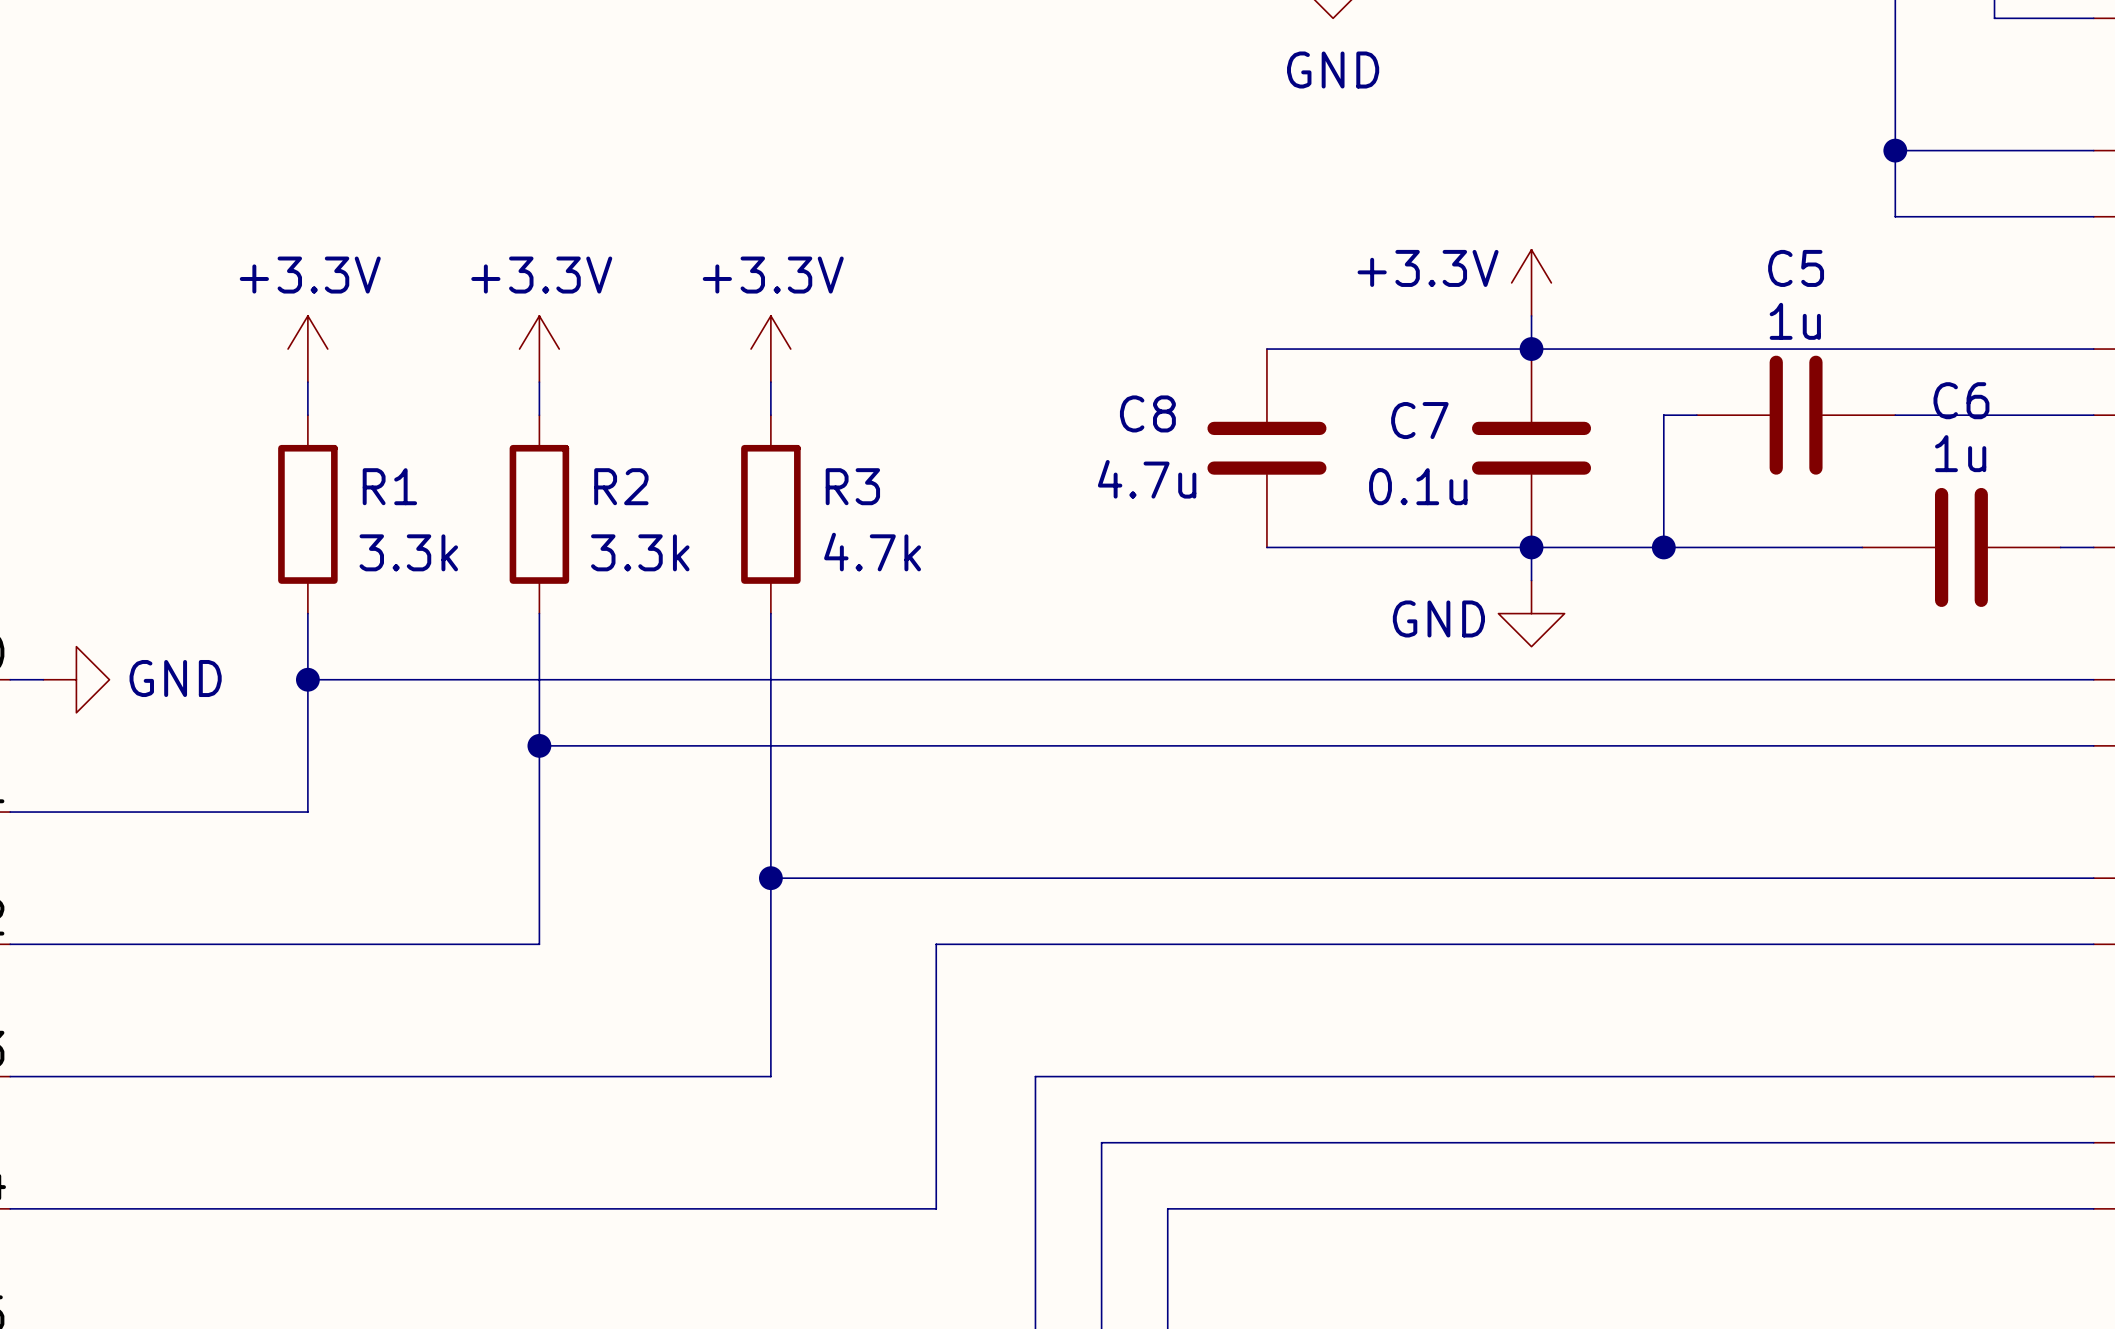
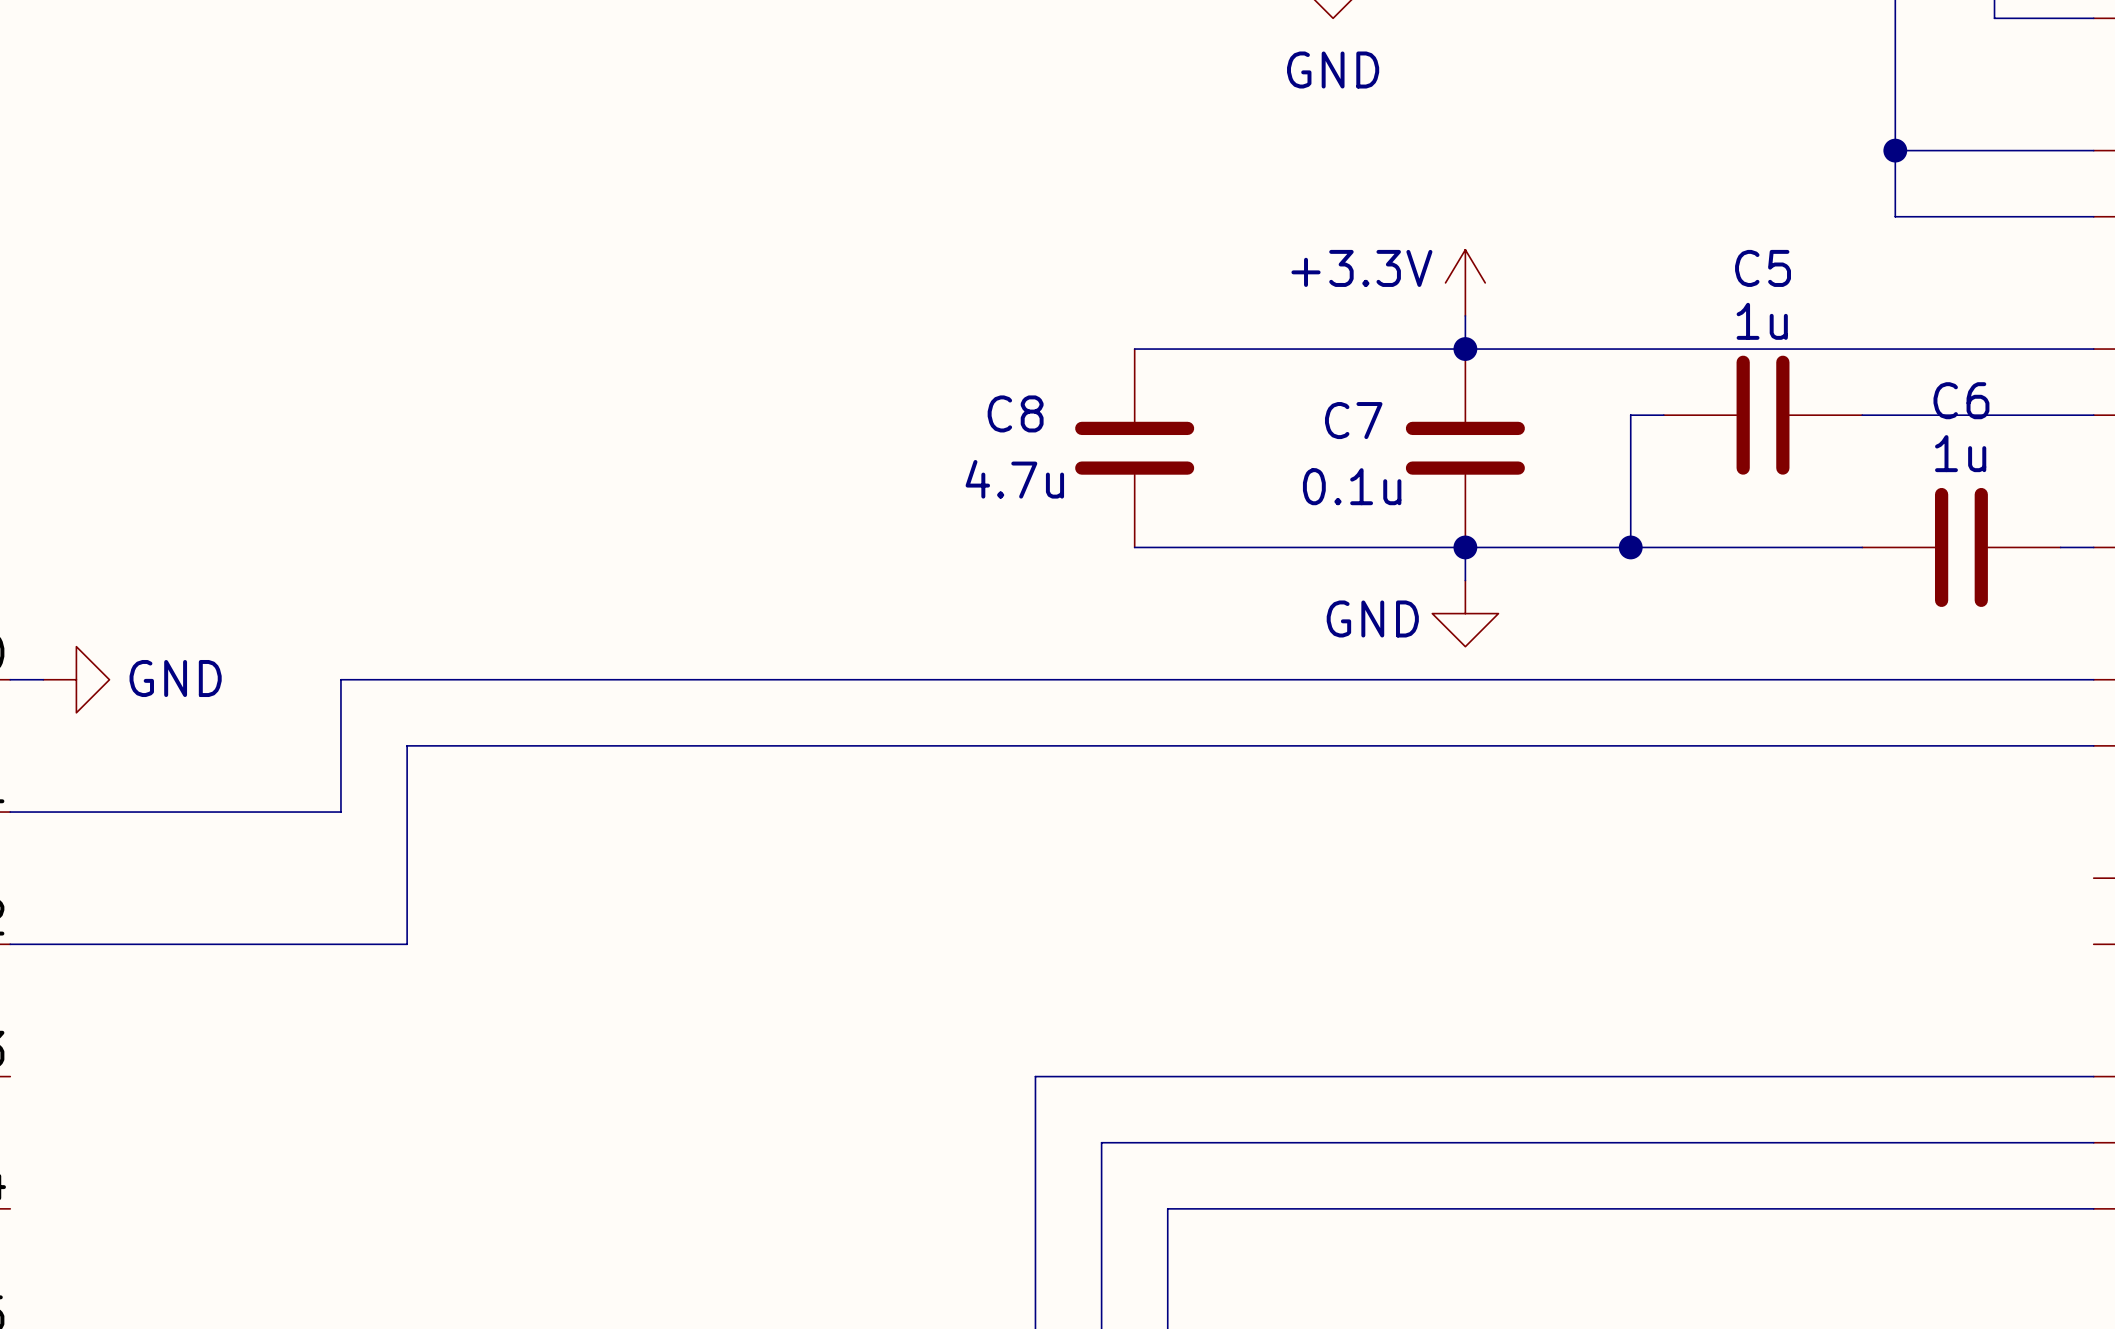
power symbol position: +3.3V (1531, 282) -> +3.3V (1465, 282)
wire: (1531, 315) (1531, 349) -> (1465, 315) (1465, 349)
power symbol: +3.3V (307, 349) -> none
power symbol: +3.3V (539, 349) -> none
power symbol: +3.3V (770, 349) -> none
wire: none -> (1134, 349) (1266, 349)
junction position: (1531, 349) -> (1465, 349)
wire: (307, 382) (307, 415) -> none
wire: (539, 382) (539, 415) -> none
wire: (770, 382) (770, 415) -> none
wire: (1696, 415) (1663, 415) (1663, 547) -> (1663, 415) (1630, 415) (1630, 547)
C5 position: (1796, 415) -> (1763, 415)
C8 position: (1266, 448) -> (1134, 448)
C7 position: (1531, 448) -> (1465, 448)
R1: 3.3k (307, 514) -> none
R2: 3.3k (539, 514) -> none
R3: 4.7k (770, 514) -> none
wire: none -> (1134, 547) (1266, 547)
junction: none -> (1465, 547)
wire: (1531, 547) (1531, 580) -> (1465, 547) (1465, 580)
junction: (1531, 547) -> none
junction position: (1663, 547) -> (1630, 547)
wire: (307, 613) (307, 812) -> (340, 679) (340, 812) (307, 812)
wire: (539, 613) (539, 944) (407, 944) -> (539, 745) (407, 745) (407, 944)
wire: (770, 613) (770, 1076) (10, 1076) -> none
power symbol position: GND (1531, 613) -> GND (1465, 613)
wire: (307, 679) (340, 679) -> none
junction: (307, 679) -> none
junction: (539, 745) -> none
wire: (770, 878) (2093, 878) -> none
junction: (770, 878) -> none
wire: (2093, 944) (936, 944) (936, 1208) (10, 1208) -> none

